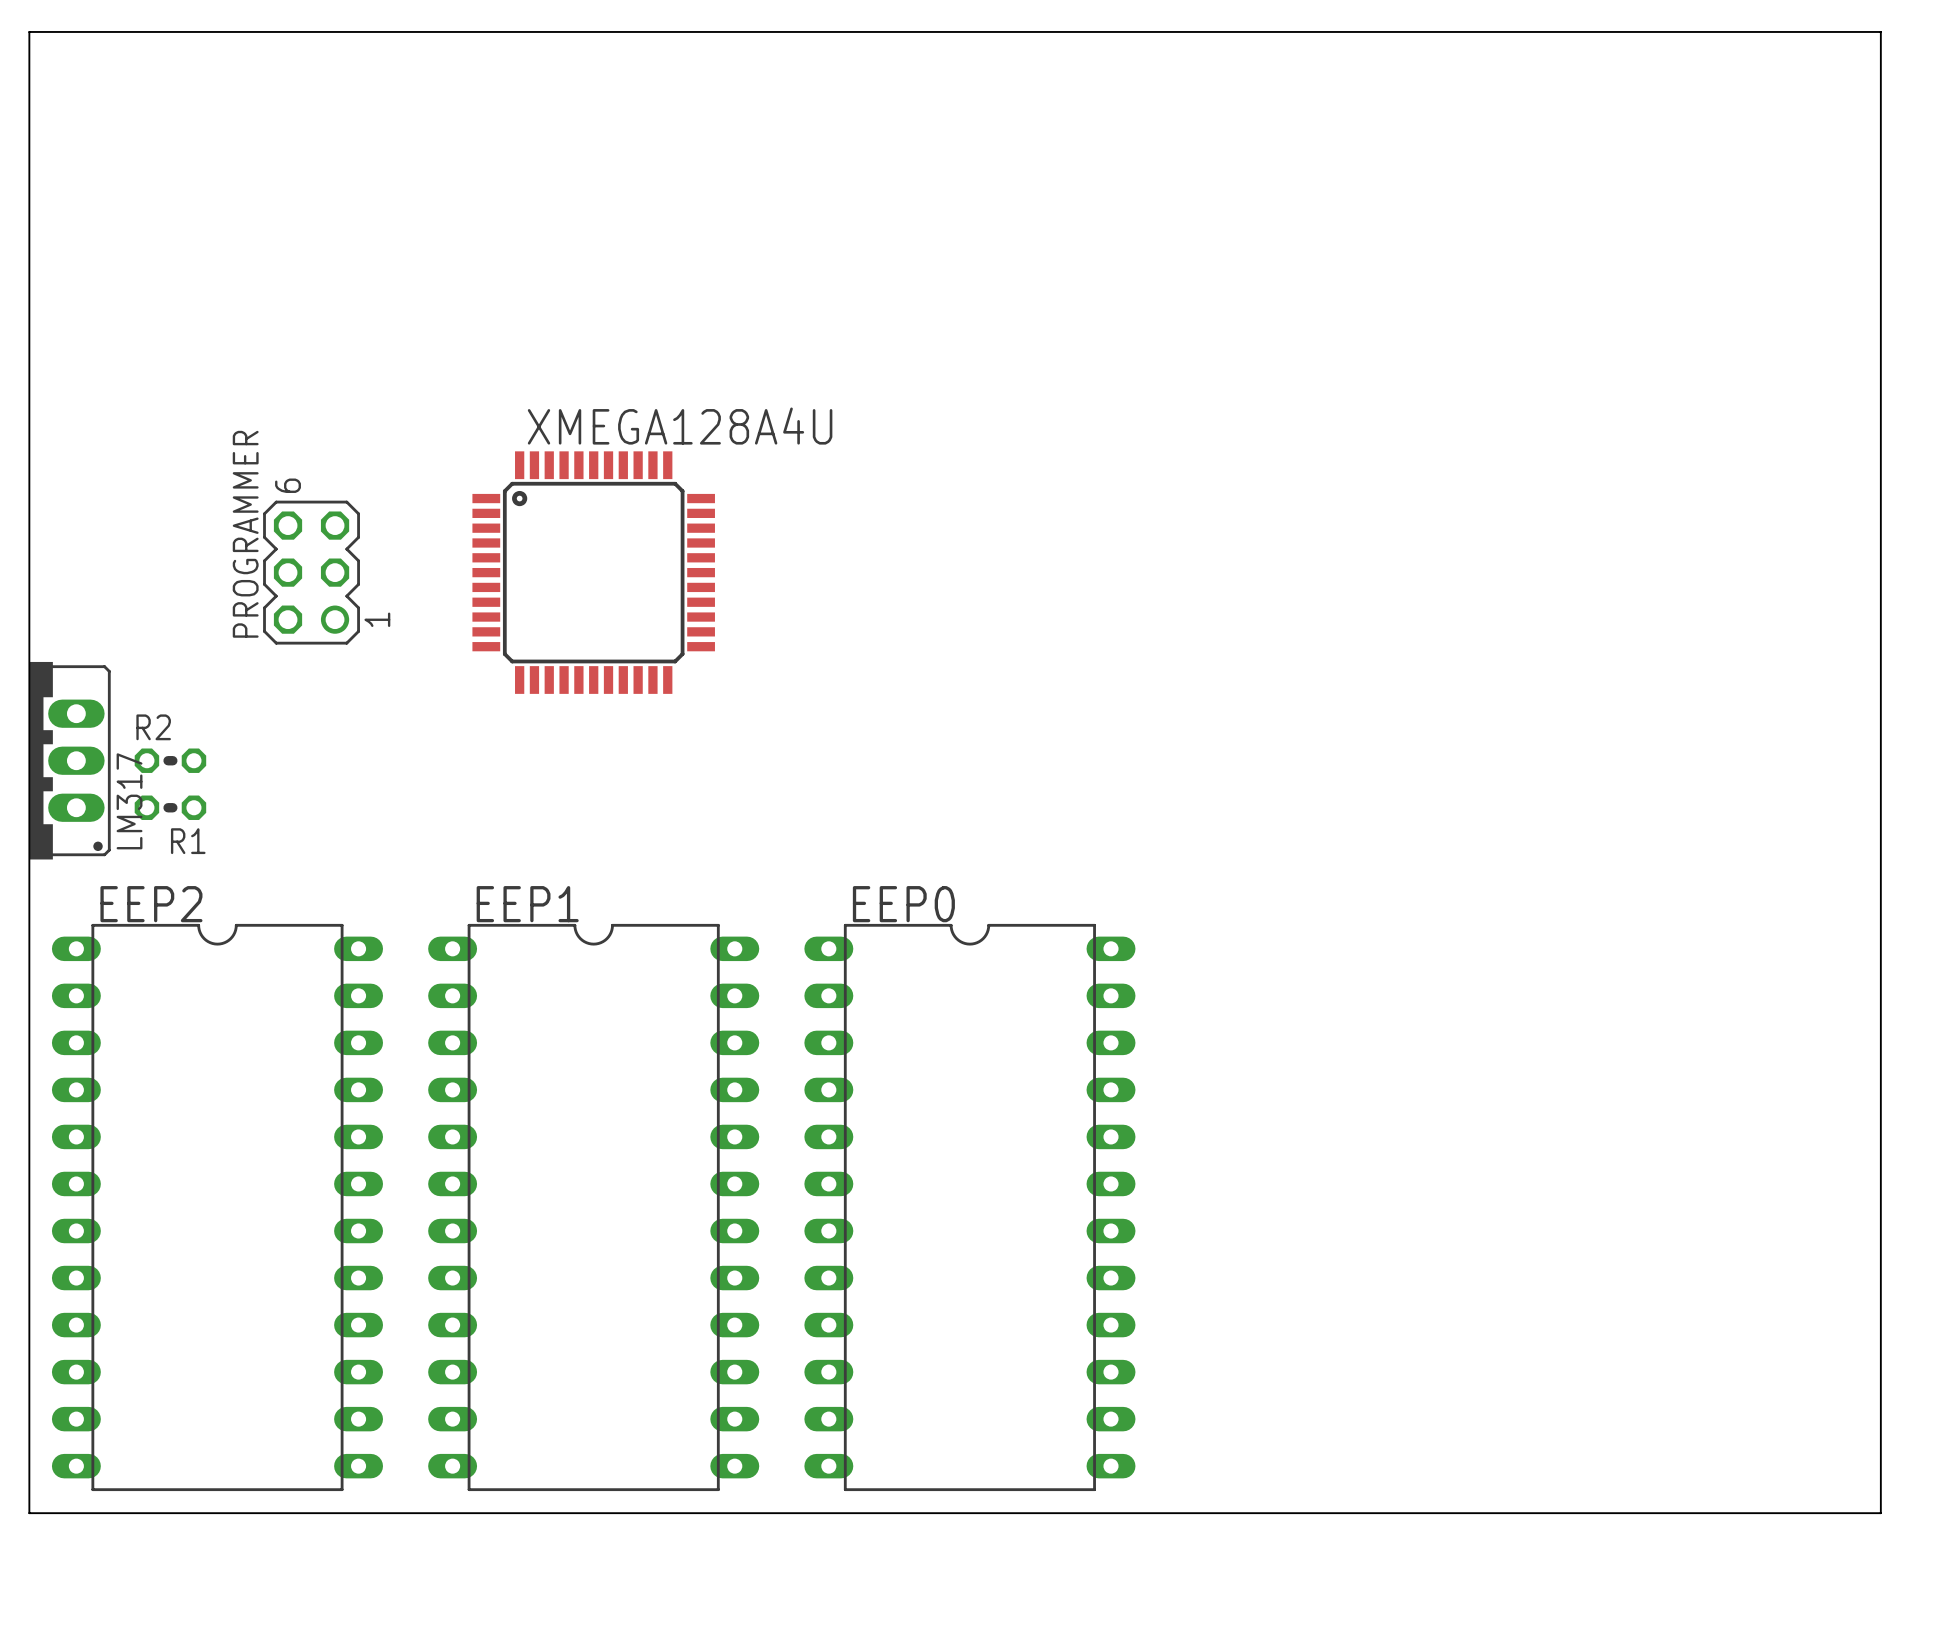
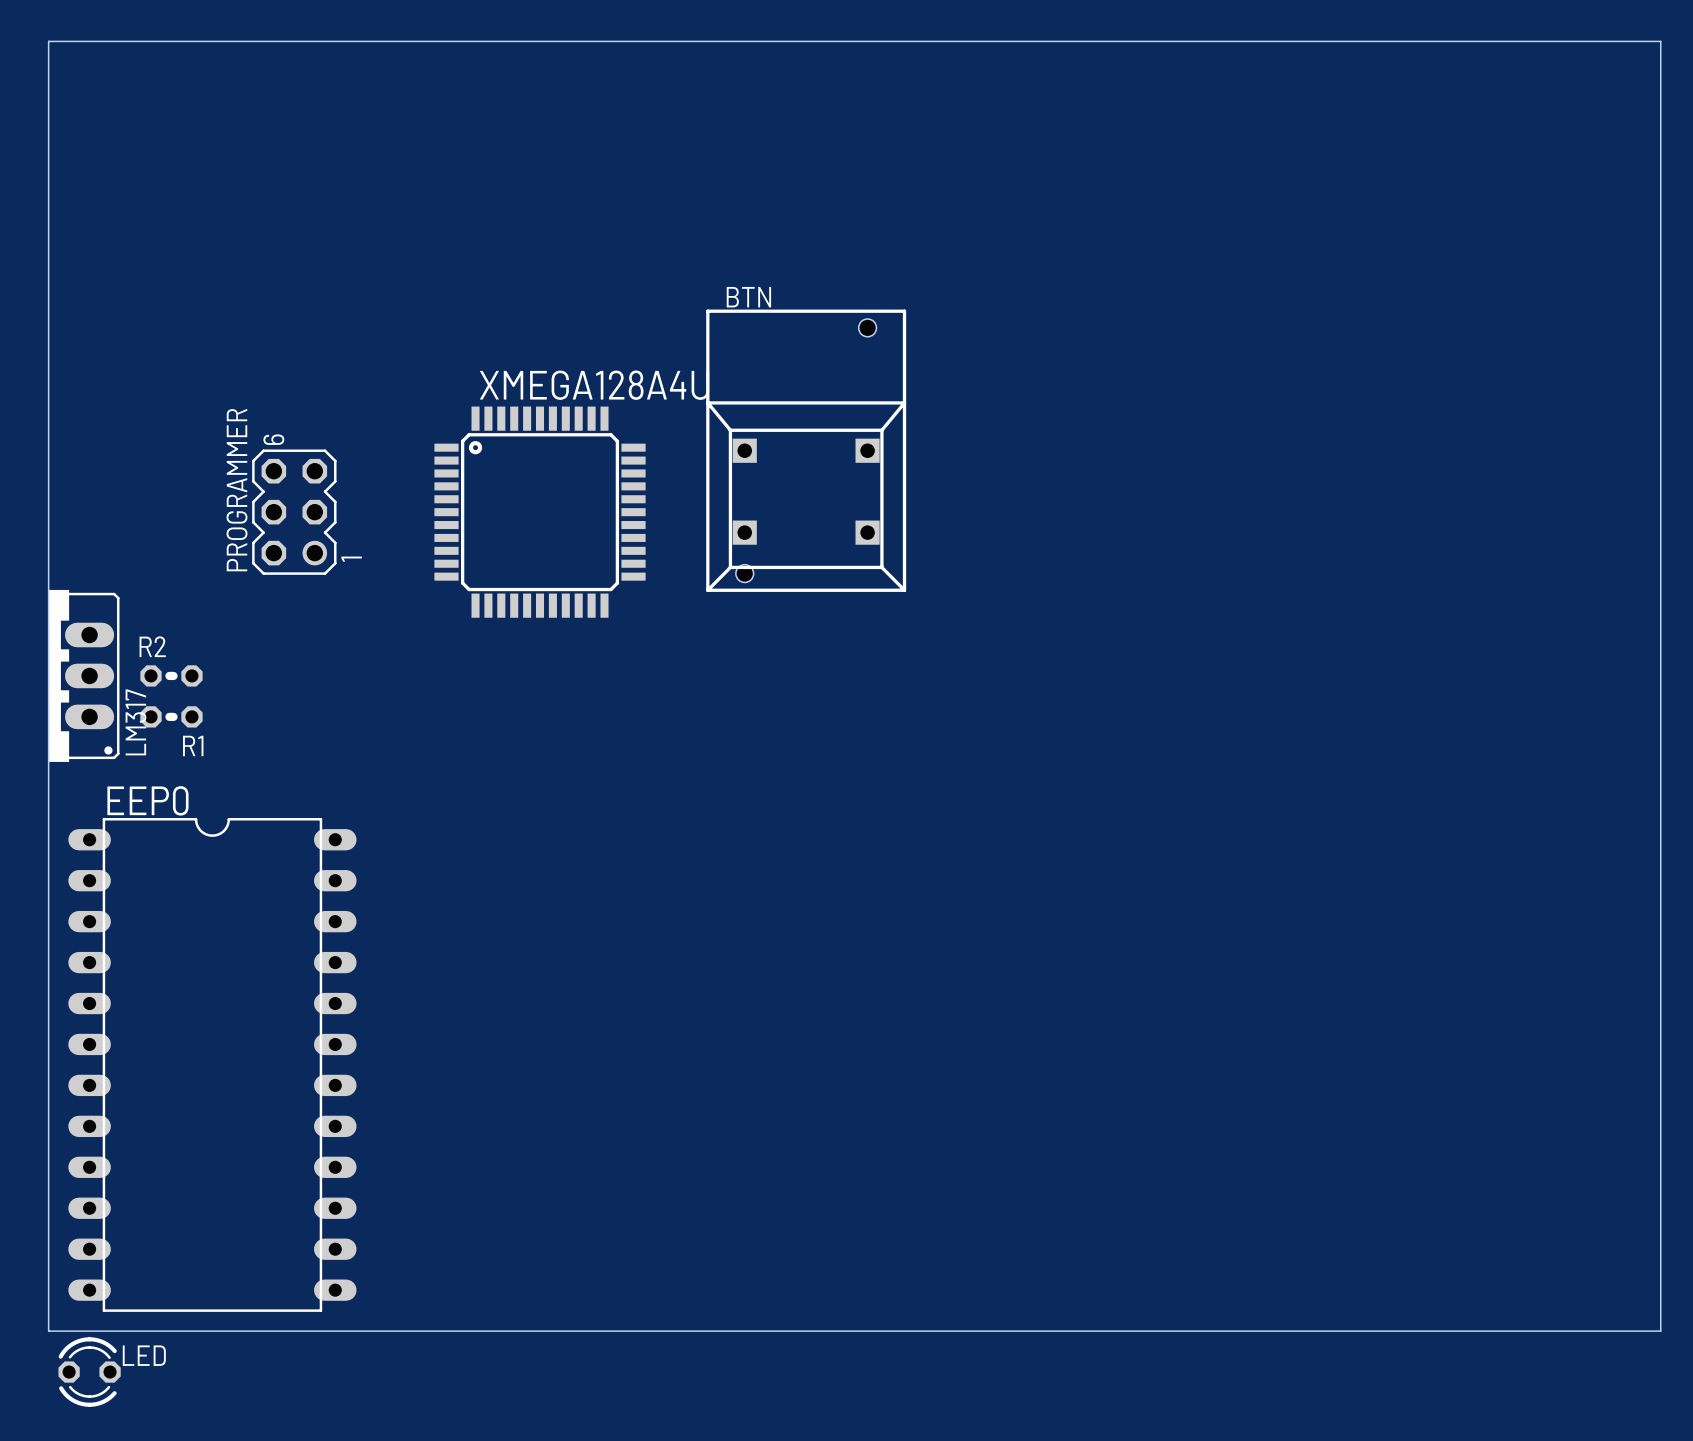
BTN: none -> (806, 450)
EEP2 name: EEP2 (151, 904) -> EEP0 (147, 800)
EEP1: (593, 1207) -> none
EEP0: (969, 1207) -> none
LED: none -> (89, 1372)

